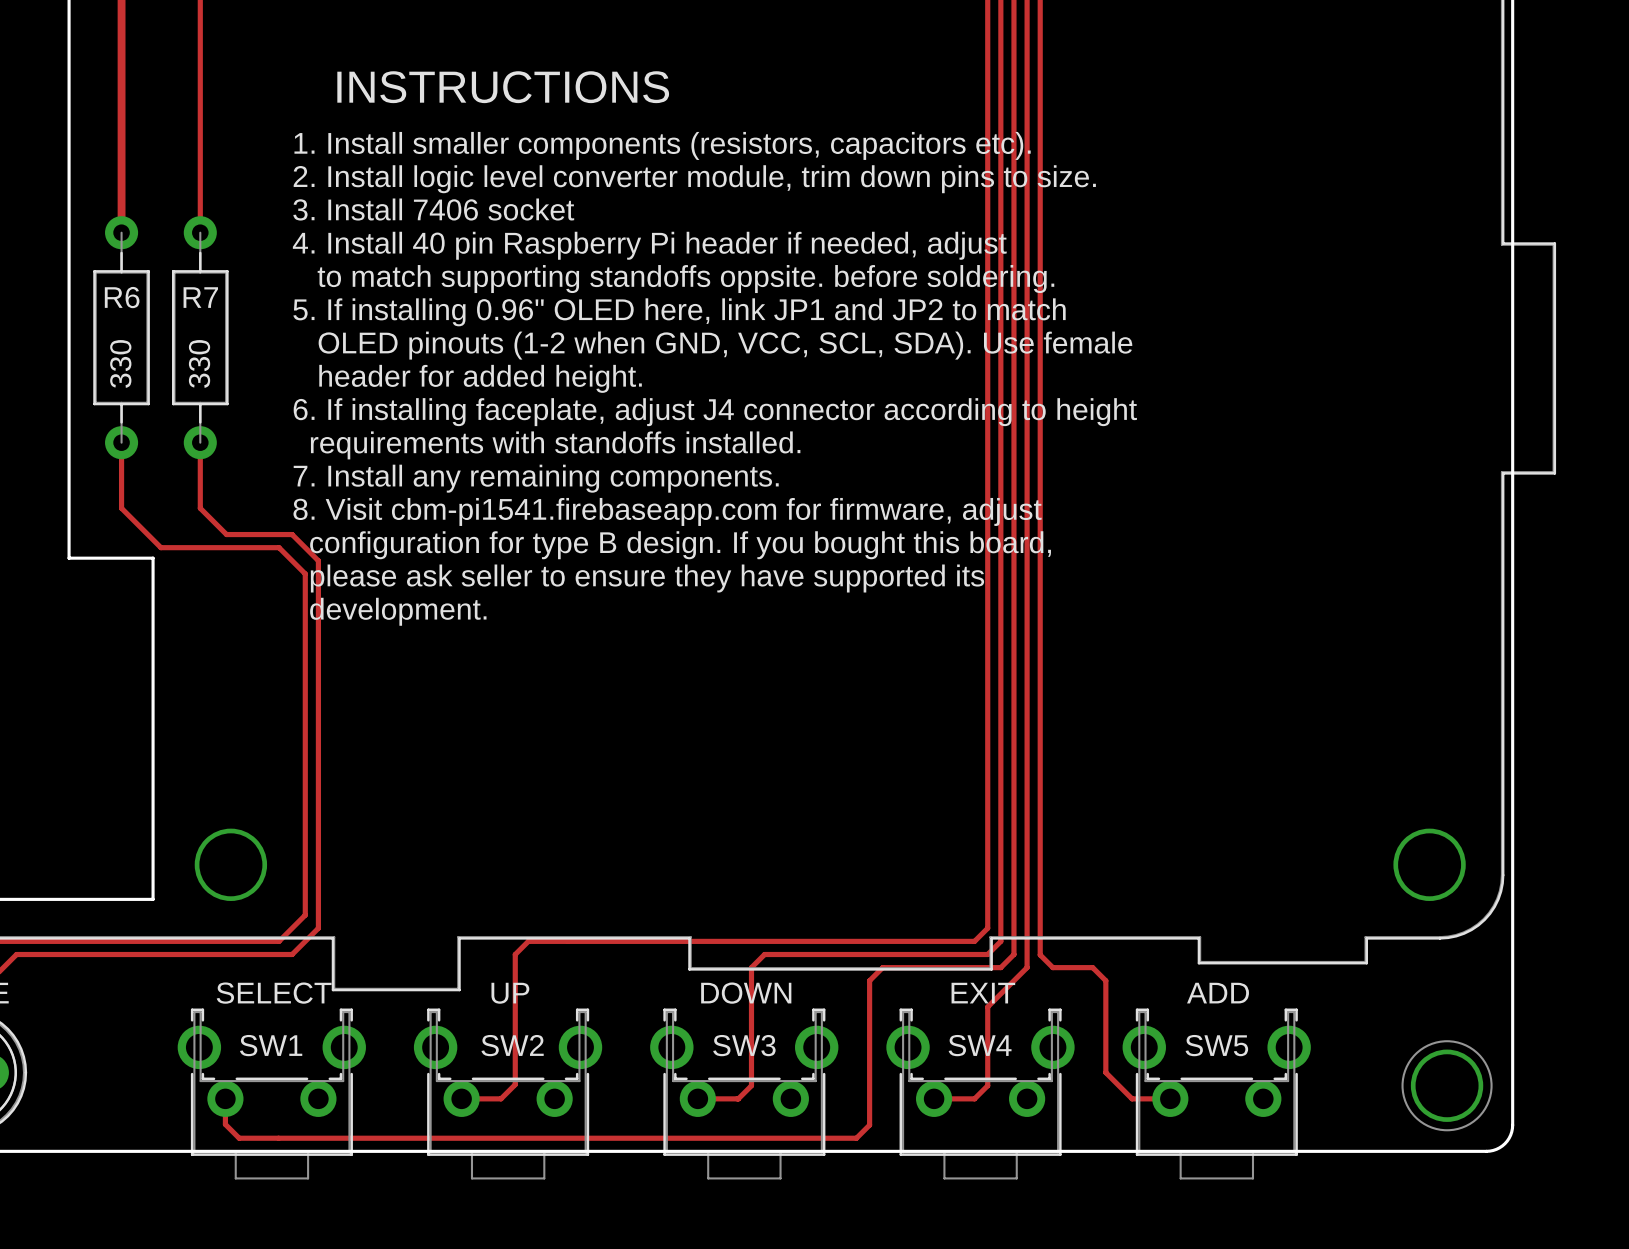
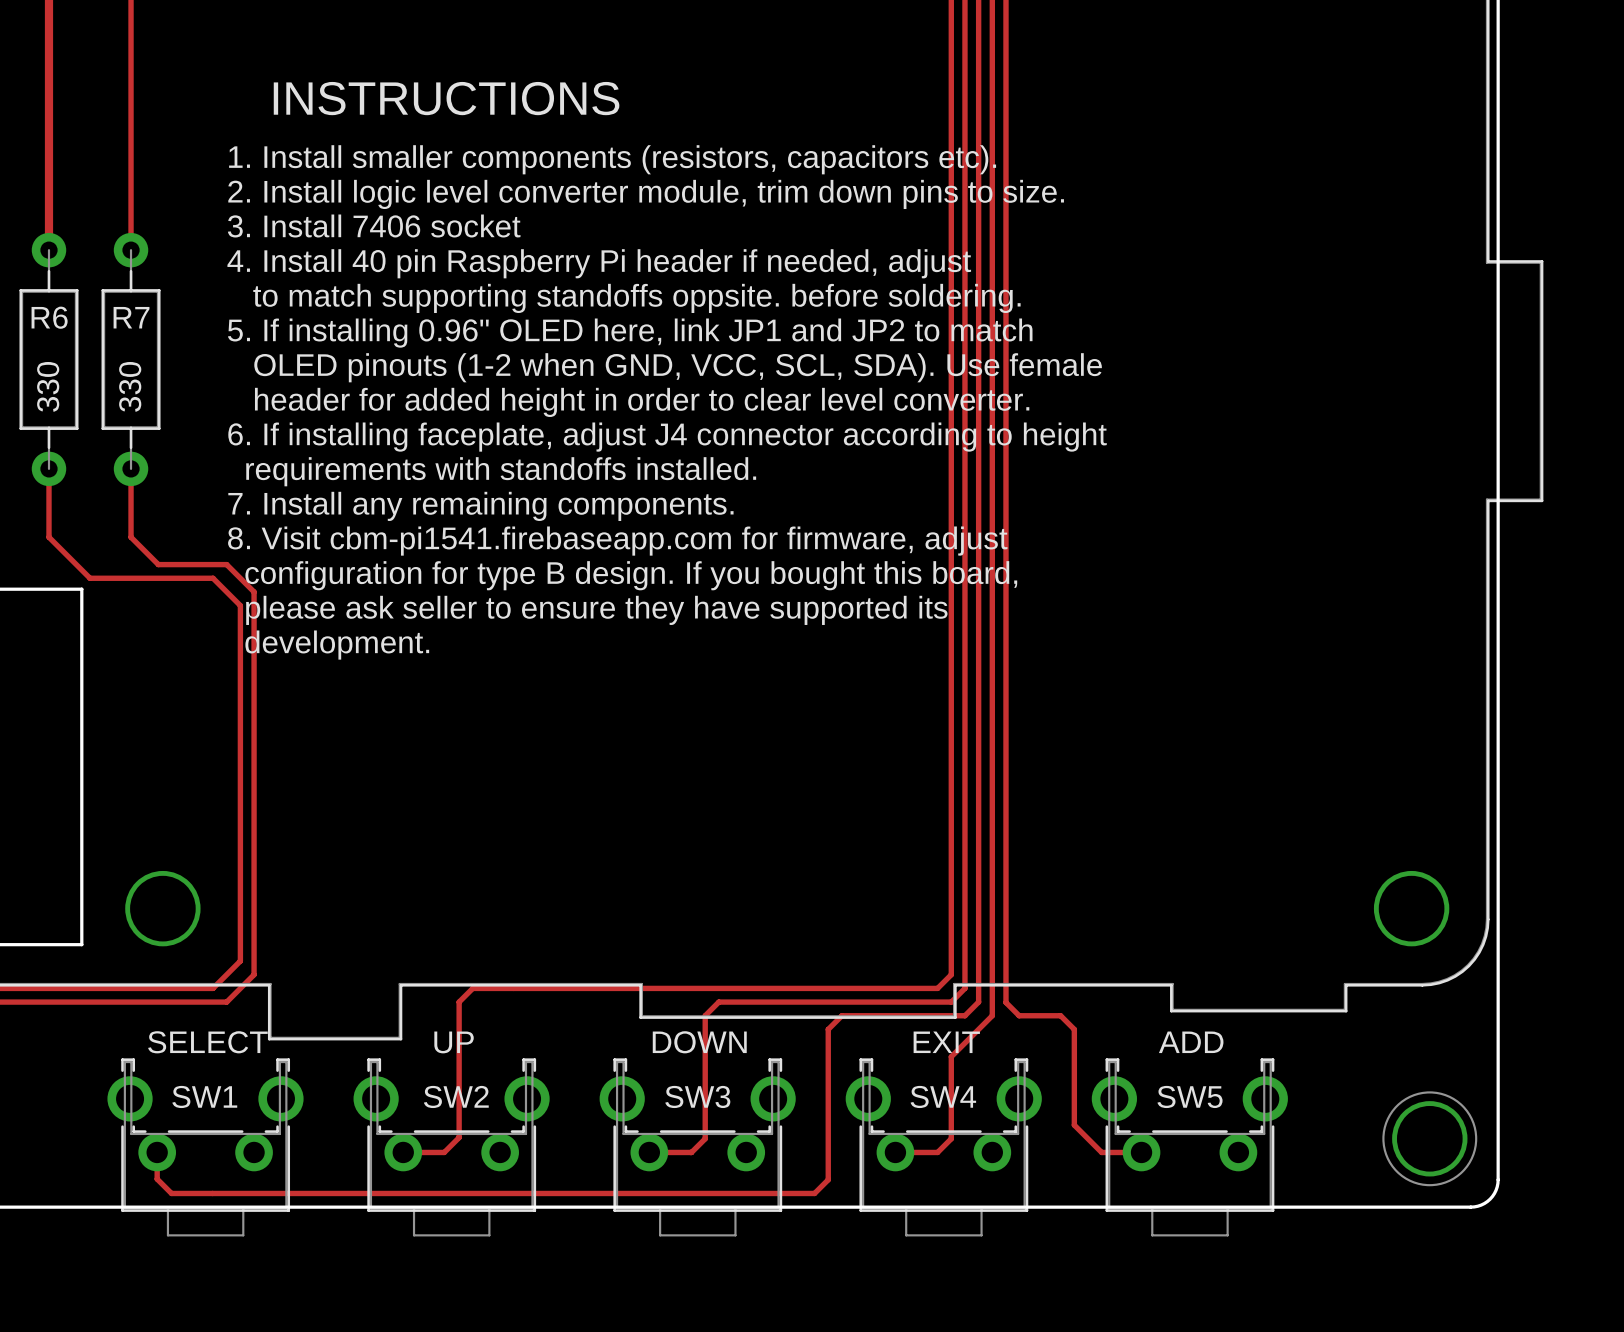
text: header for added height. (480, 378) -> header for added height in order to clear level converter. (642, 402)

